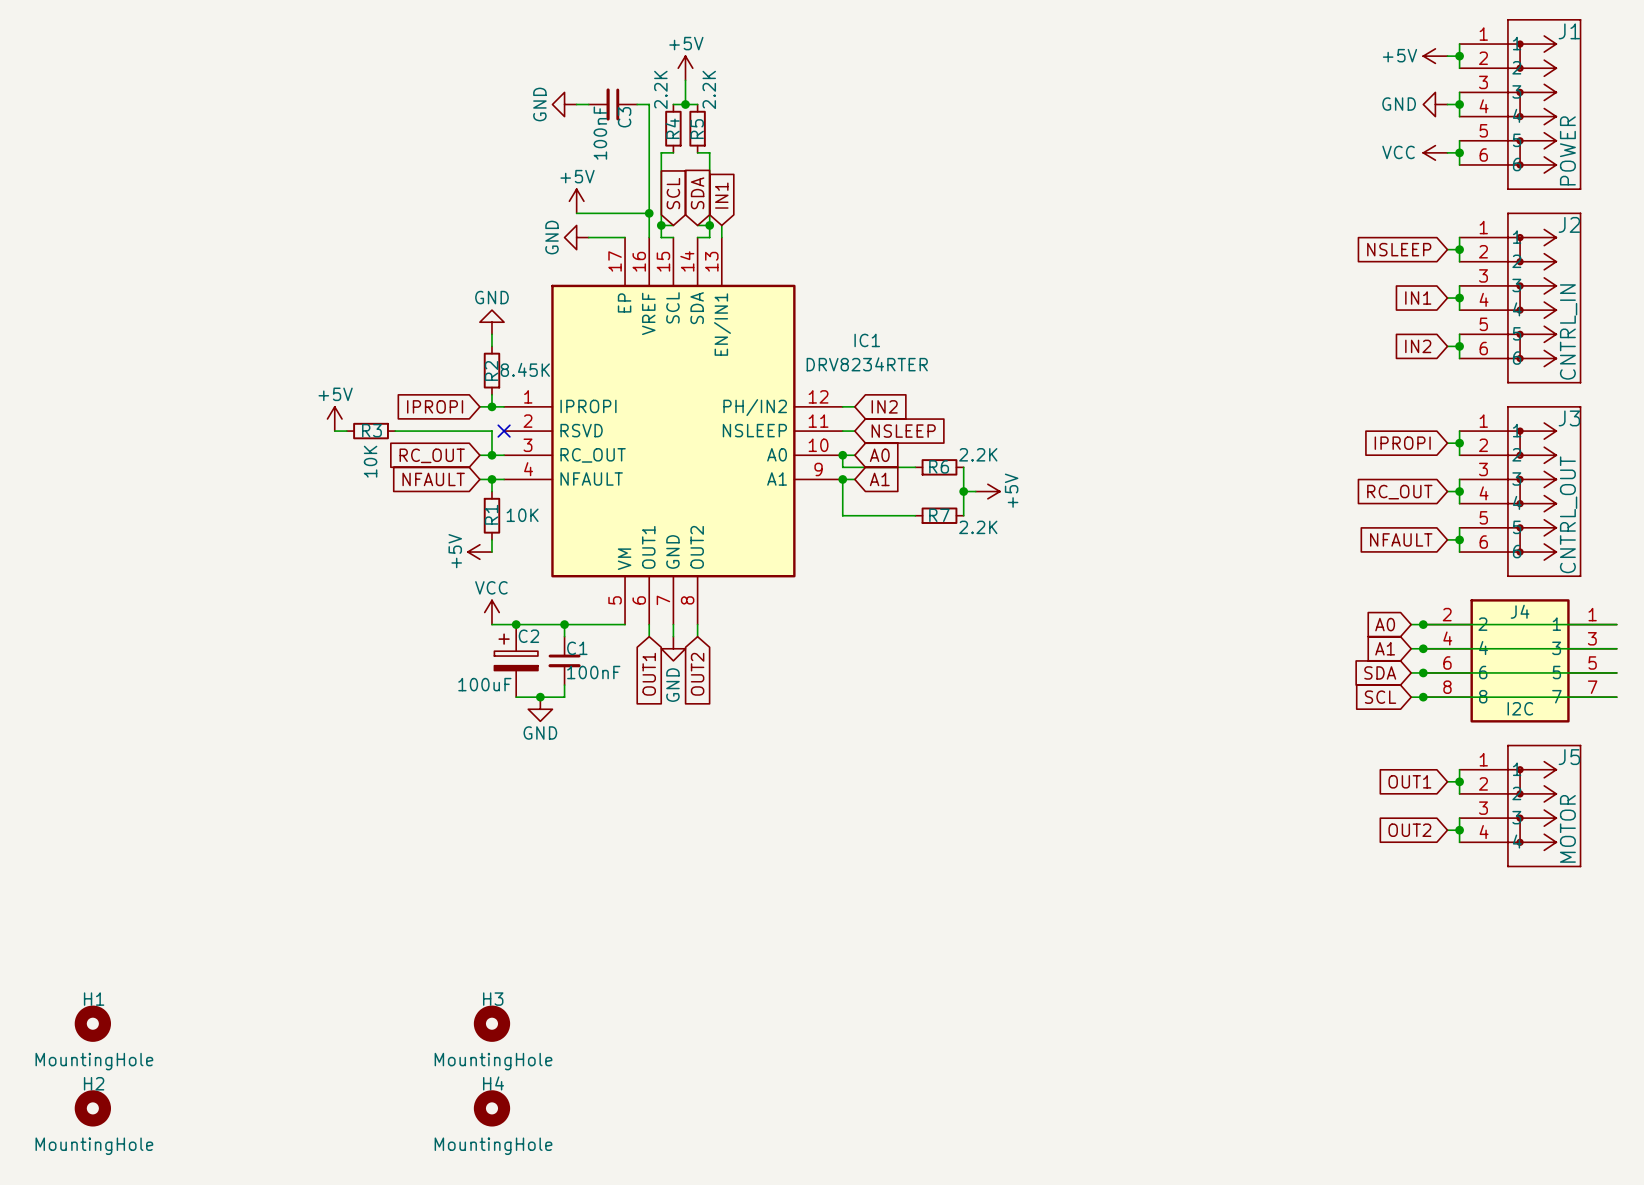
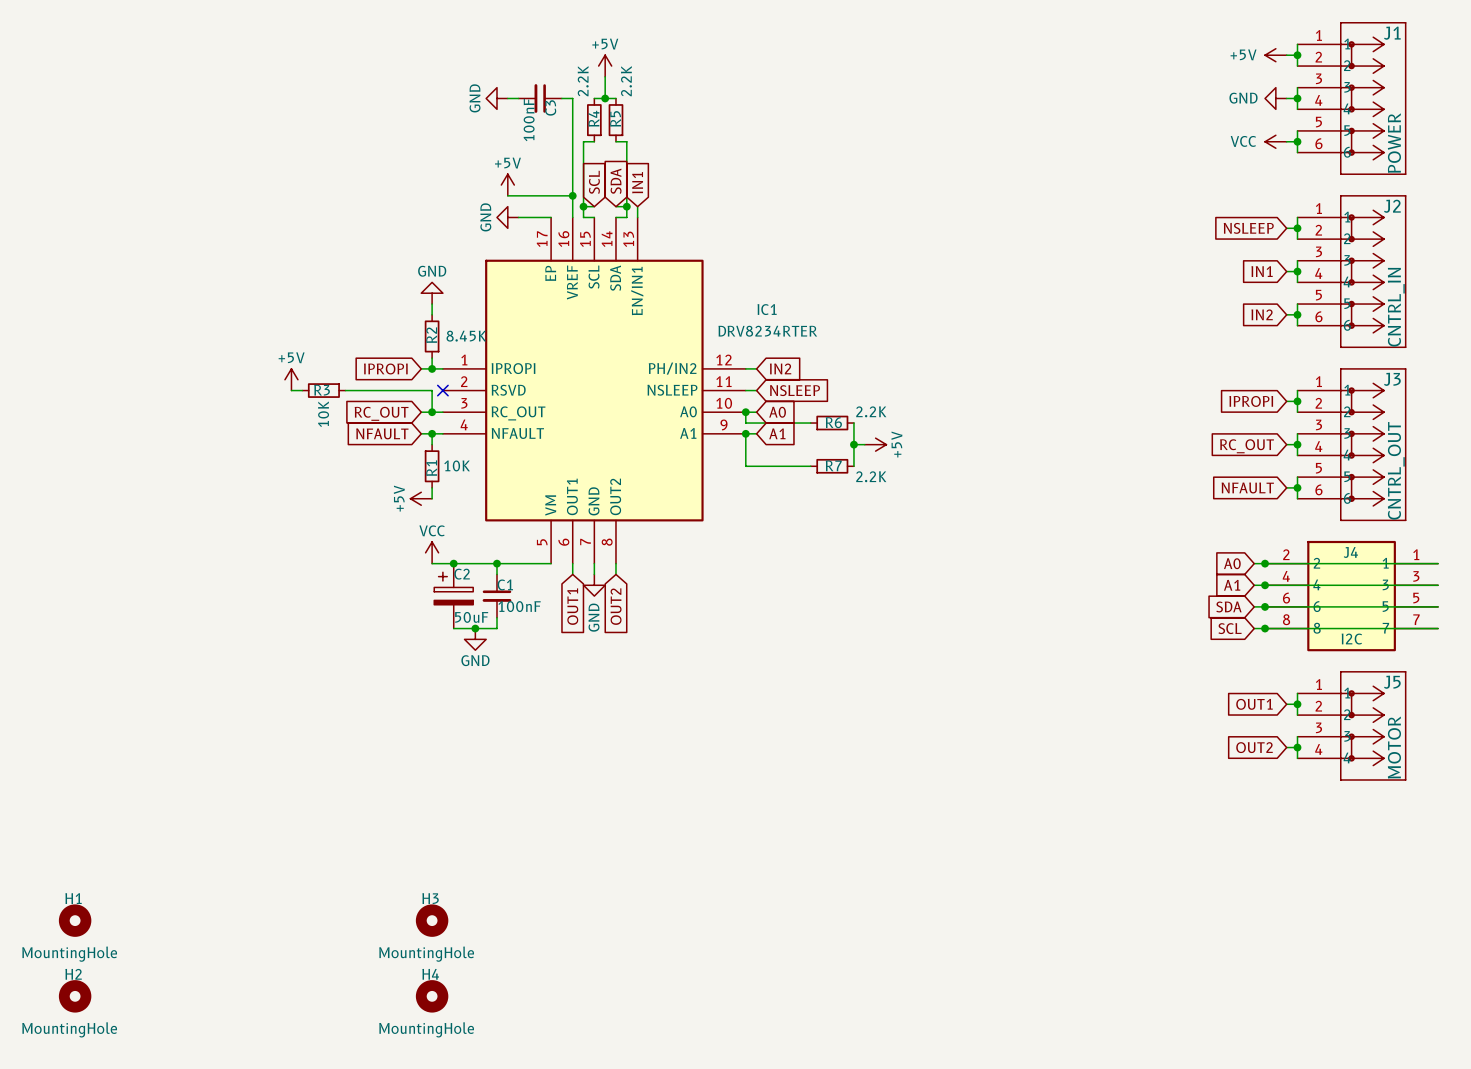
C2 value: 100uF (484, 684) -> 50uF (471, 617)

